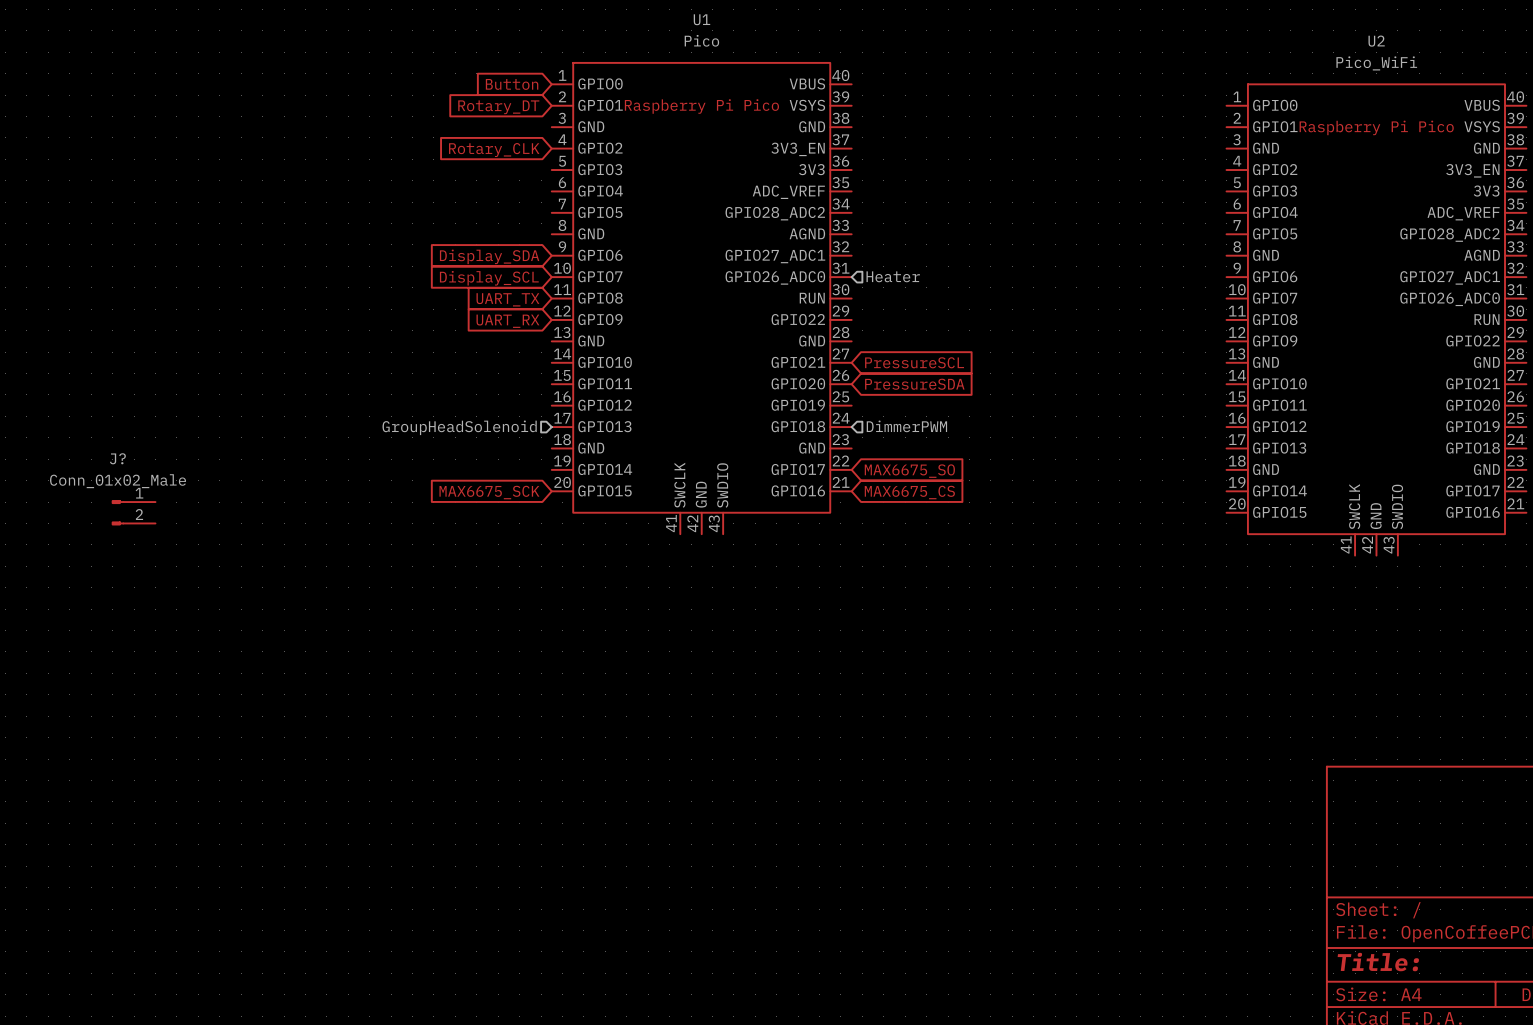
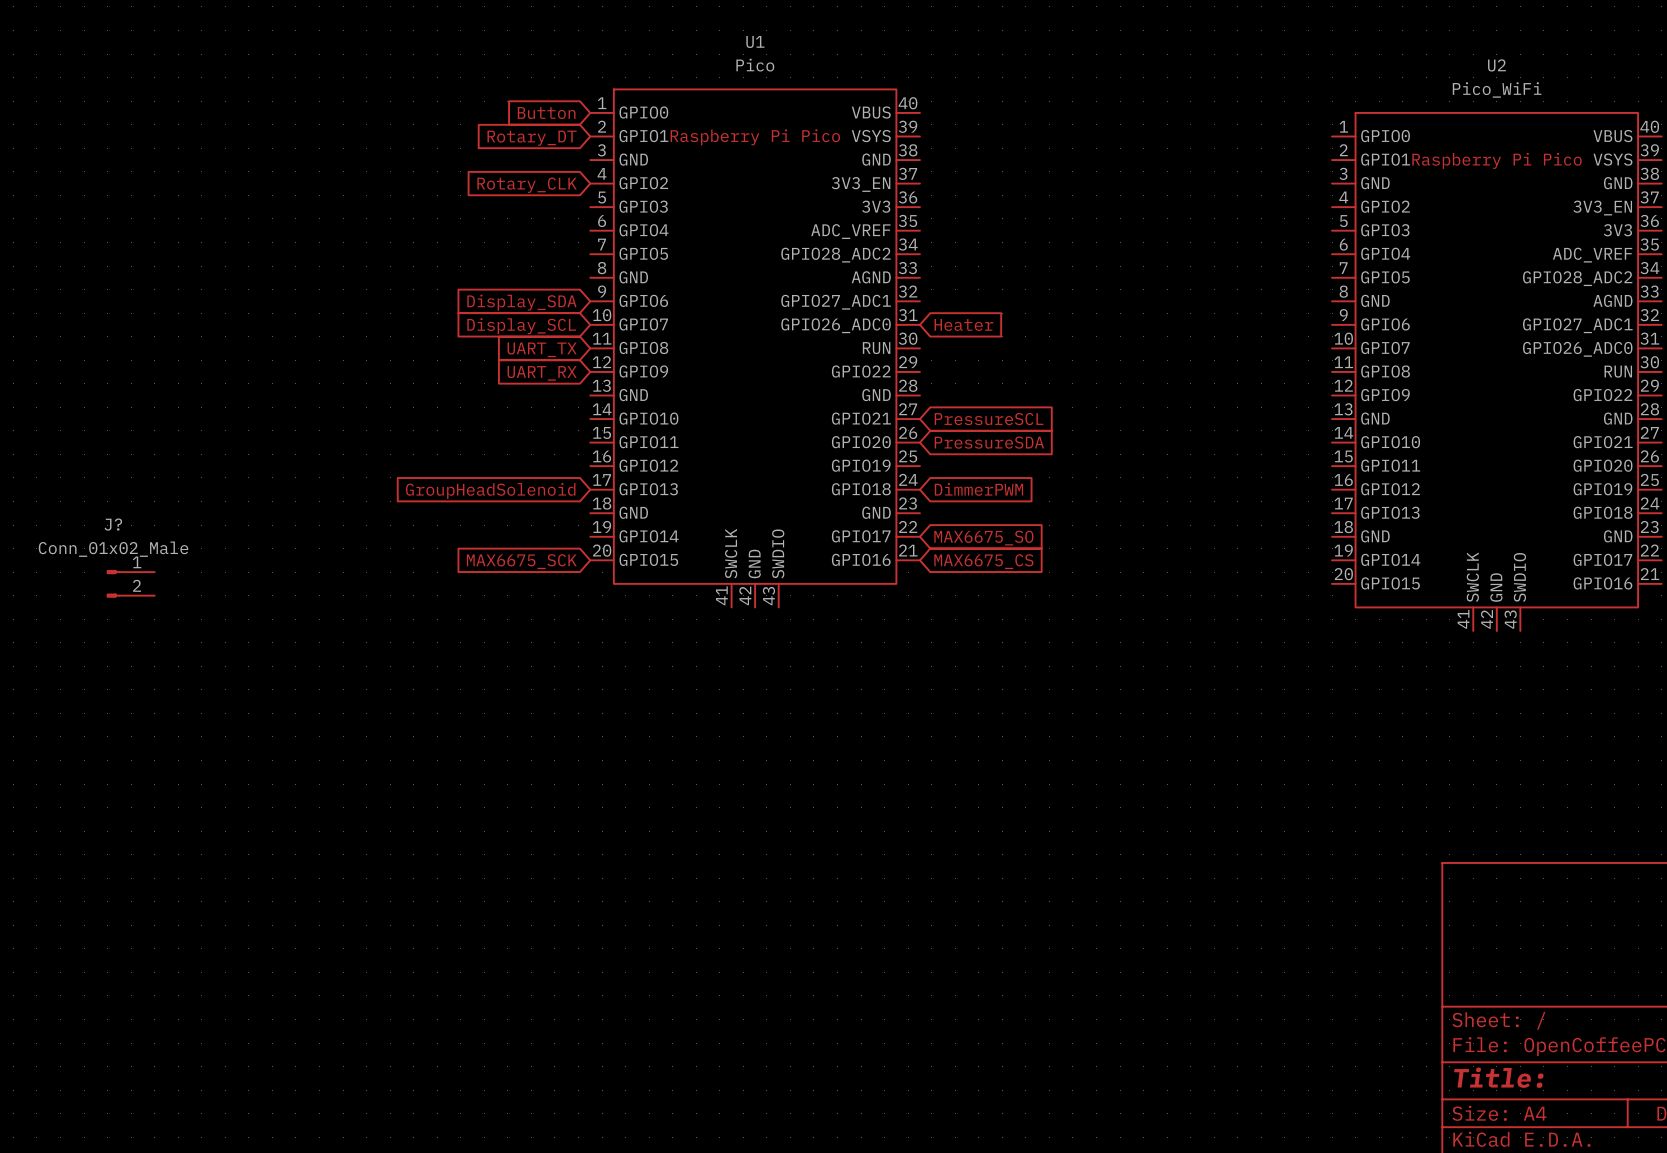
hierarchical label: Heater (893, 276) -> none
global label: none -> Heater (963, 324)
global label: none -> DimmerPWM (978, 489)
hierarchical label: DimmerPWM (906, 426) -> none
hierarchical label: GroupHeadSolenoid (459, 427) -> none
global label: none -> GroupHeadSolenoid (490, 490)

